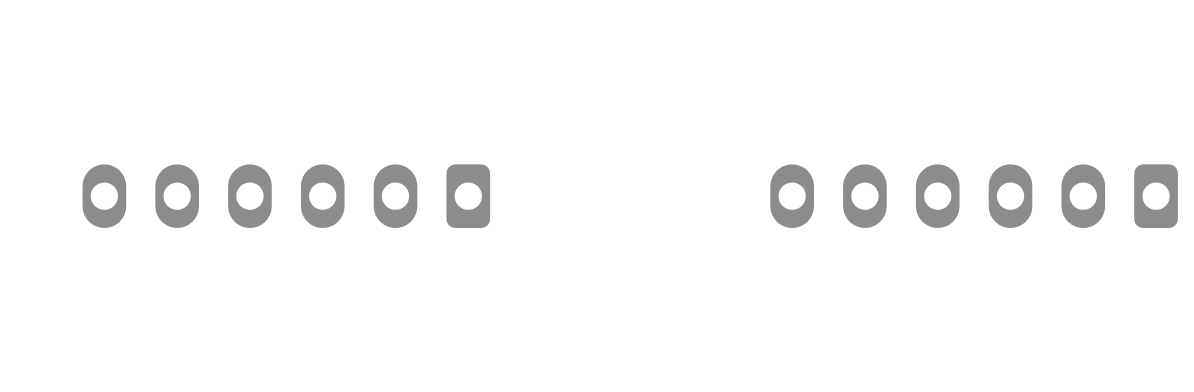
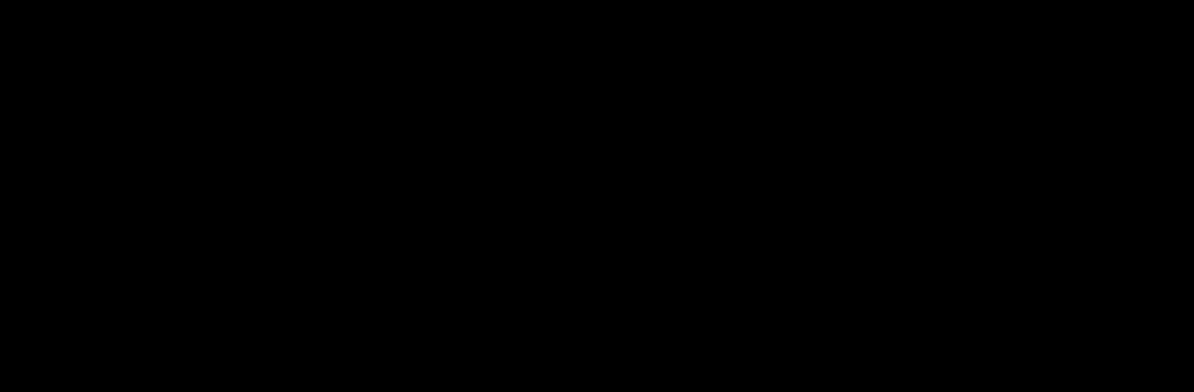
part: (286, 196) -> none
part: (974, 196) -> none

